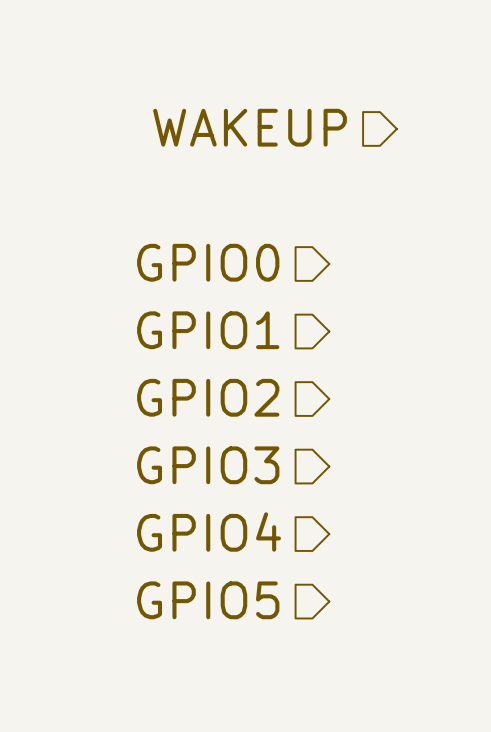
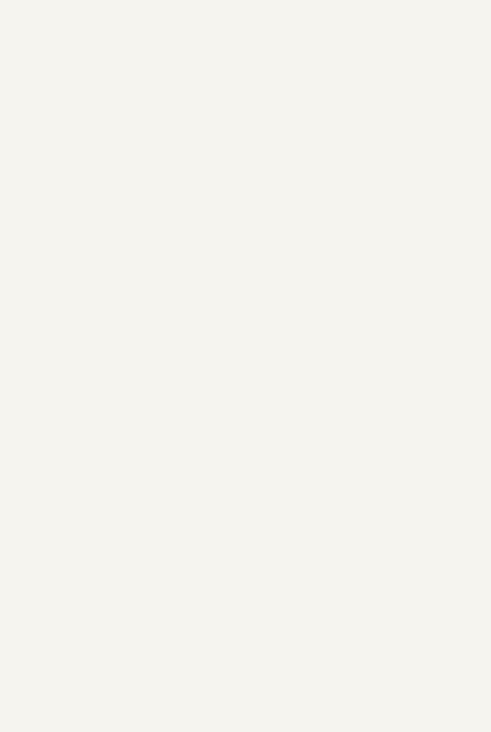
hierarchical label: WAKEUP (250, 127) -> none
hierarchical label: GPIO0 (208, 262) -> none
hierarchical label: GPIO1 (208, 330) -> none
hierarchical label: GPIO2 (208, 397) -> none
hierarchical label: GPIO3 (208, 465) -> none
hierarchical label: GPIO4 (209, 532) -> none
hierarchical label: GPIO5 (208, 600) -> none

